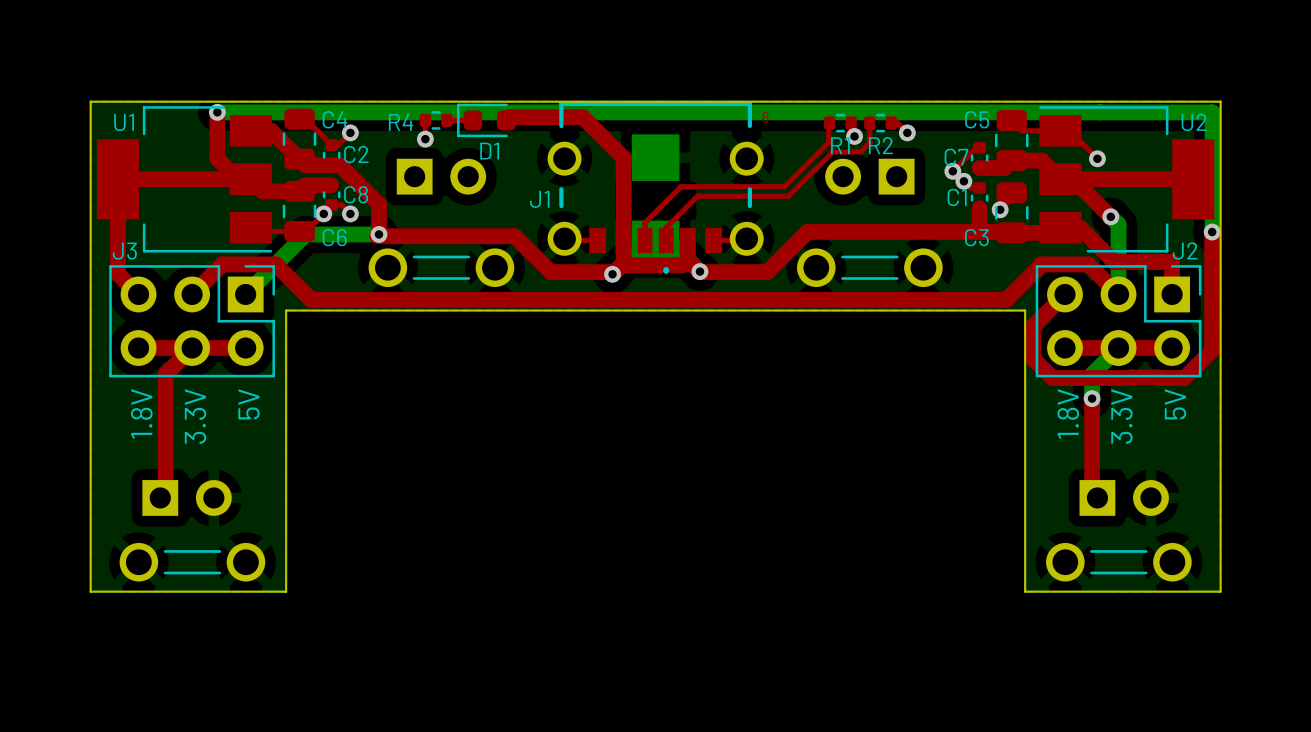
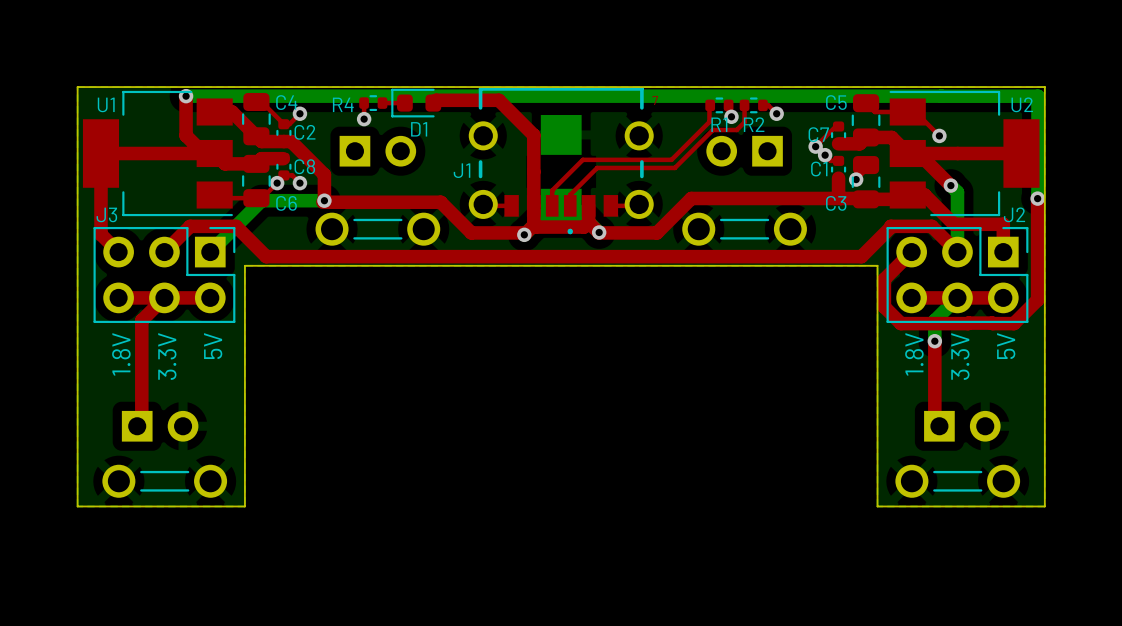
text: 6 (765, 117) -> 7 (655, 100)

